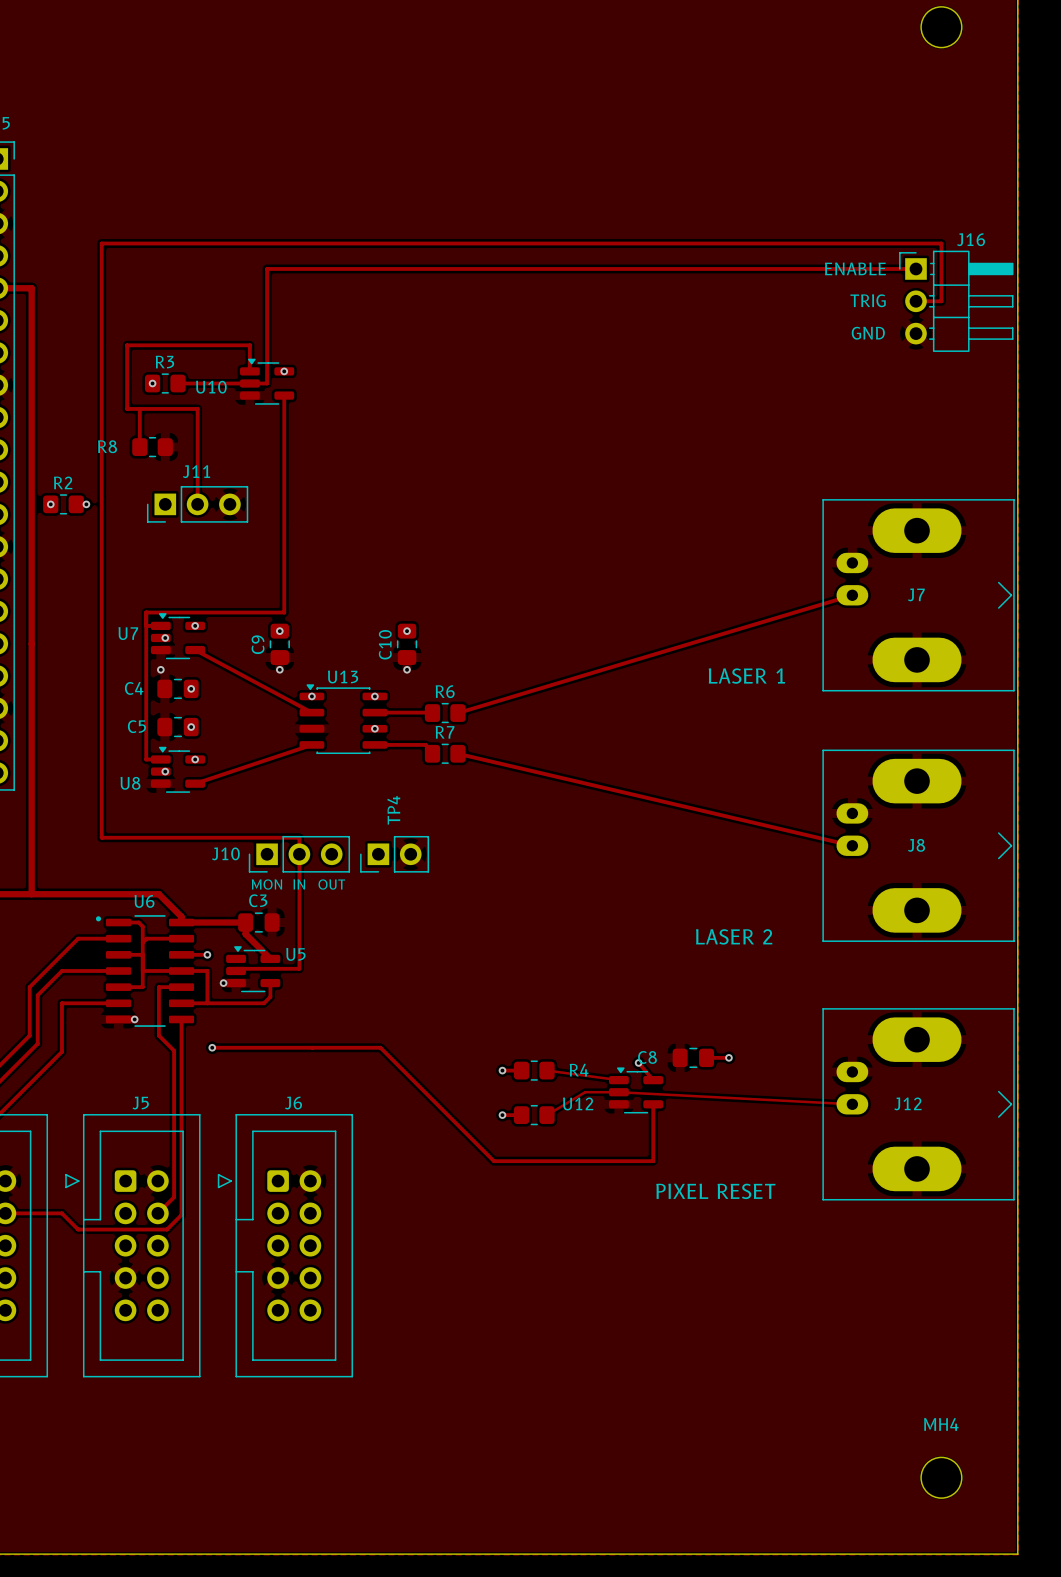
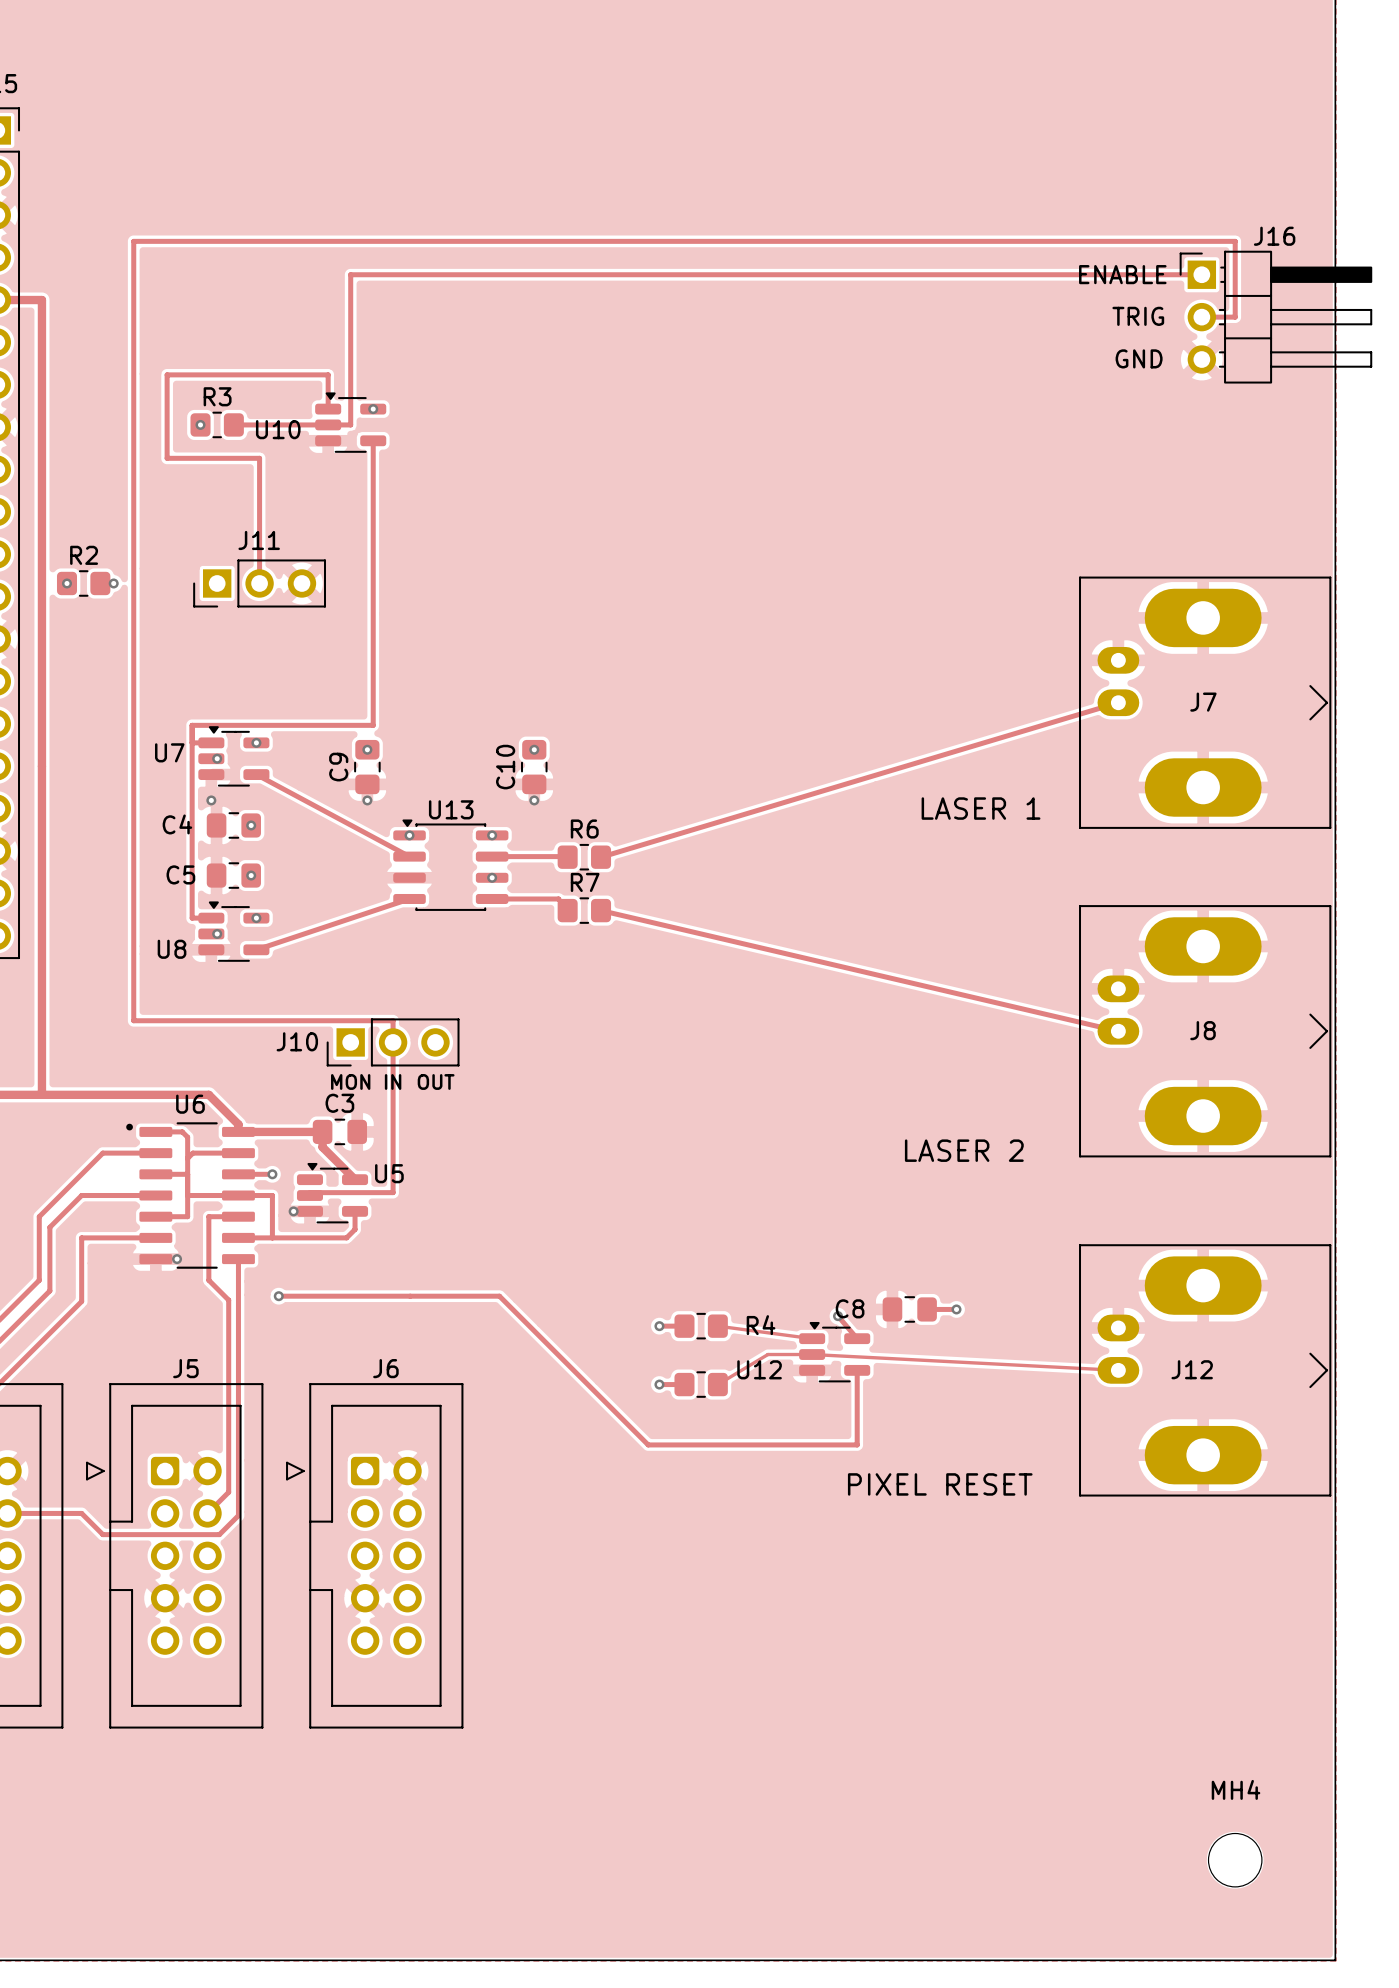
J16 footprint: [899, 250, 1014, 352] -> [1179, 250, 1373, 384]
track: (139, 408) (139, 447) -> none
R8: (152, 447) -> none
TP4: (394, 854) -> none

